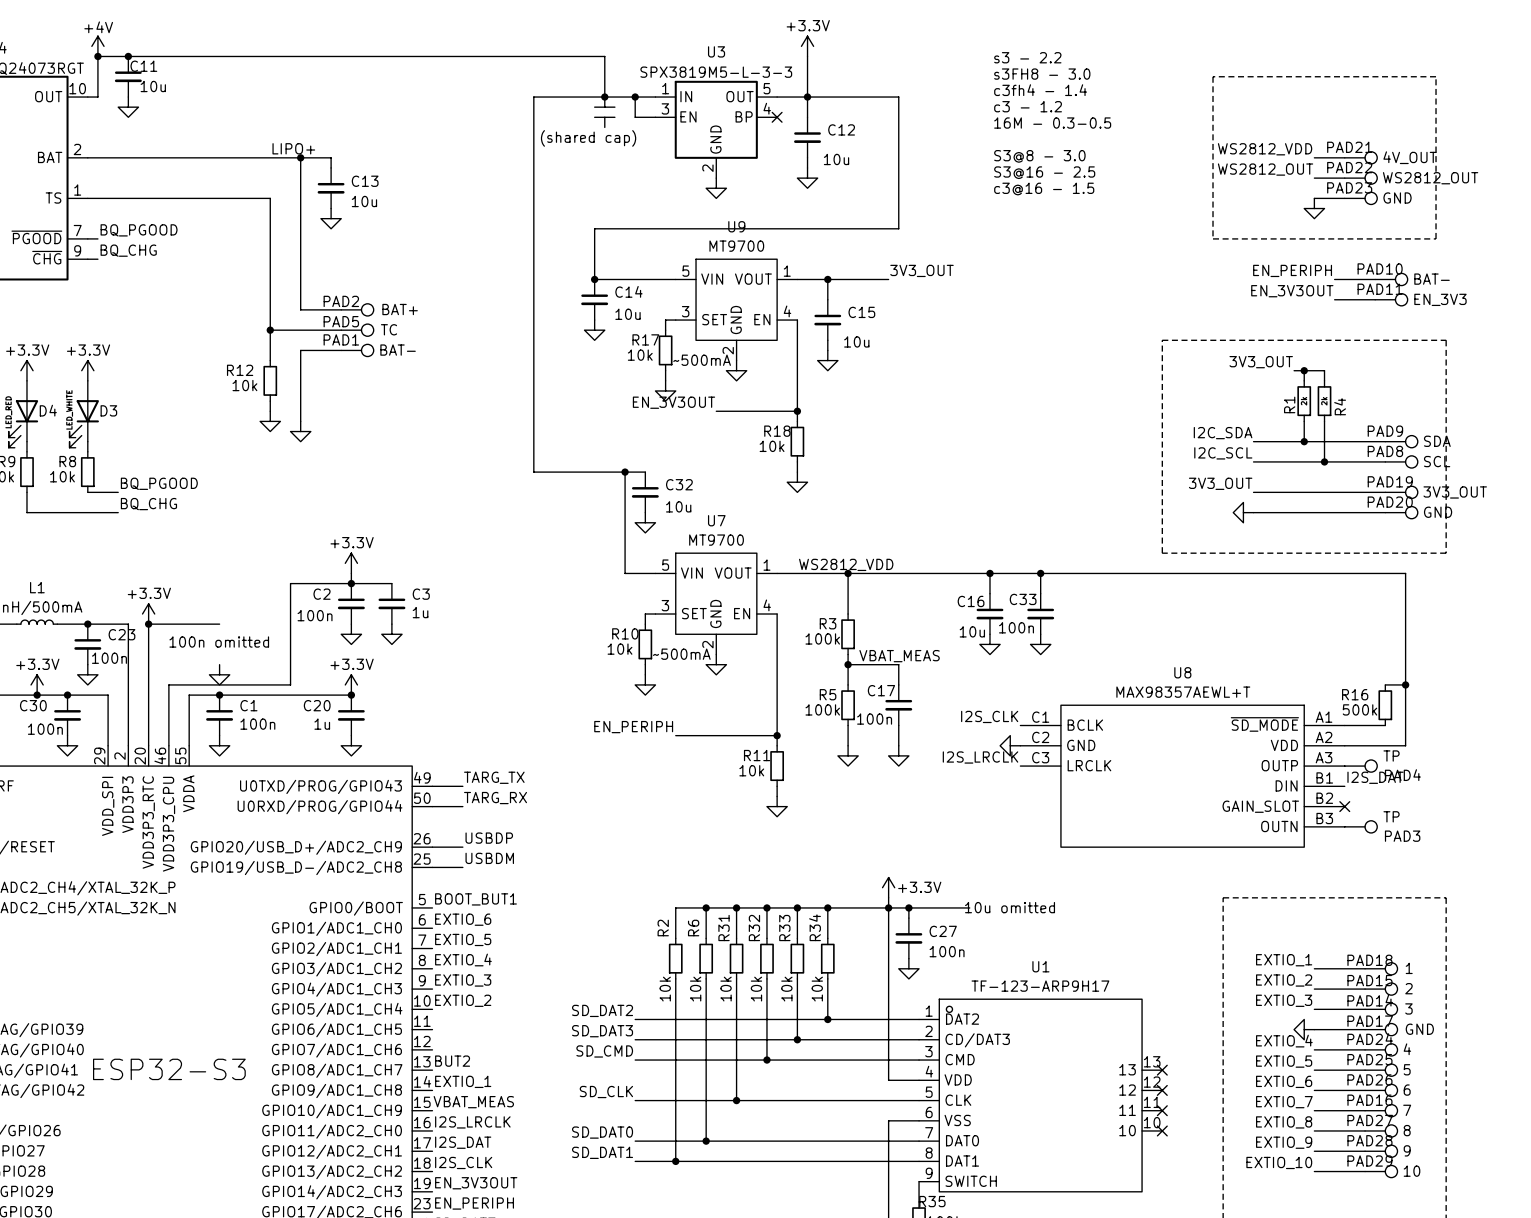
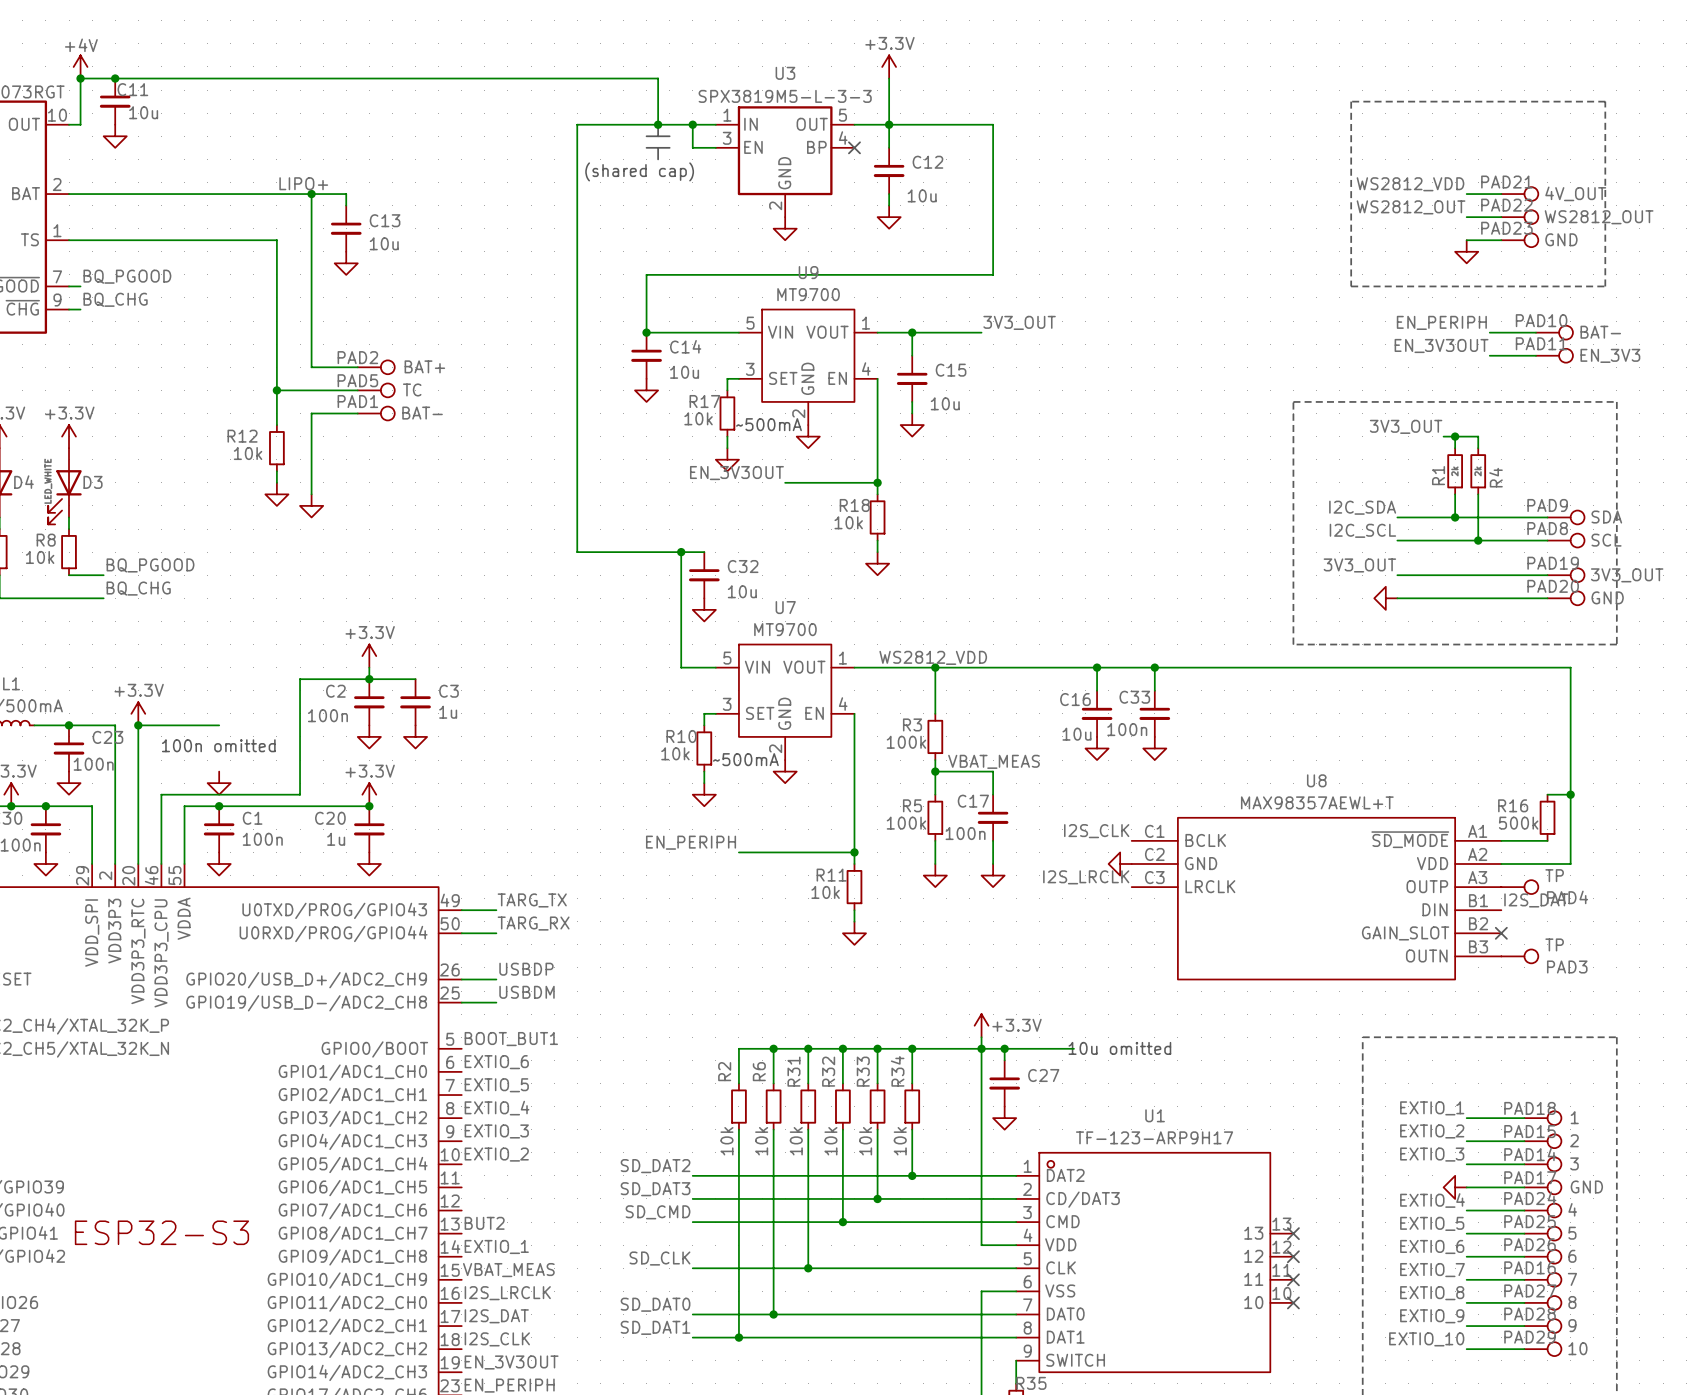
text: s3 - 2.2 (1027, 57) -> none
text: s3FH8 - 3.0 (1042, 74) -> none
text: c3fh4 - 1.4 (1040, 90) -> none
text: c3 - 1.2 (1028, 106) -> none
text: 16M - 0.3-0.5 (1052, 123) -> none
text: S3@8 - 3.0 (1039, 156) -> none
text: S3@16 - 2.5 (1044, 172) -> none
text: c3@16 - 1.5 (1044, 189) -> none
C27 value: 100n (947, 951) -> none

